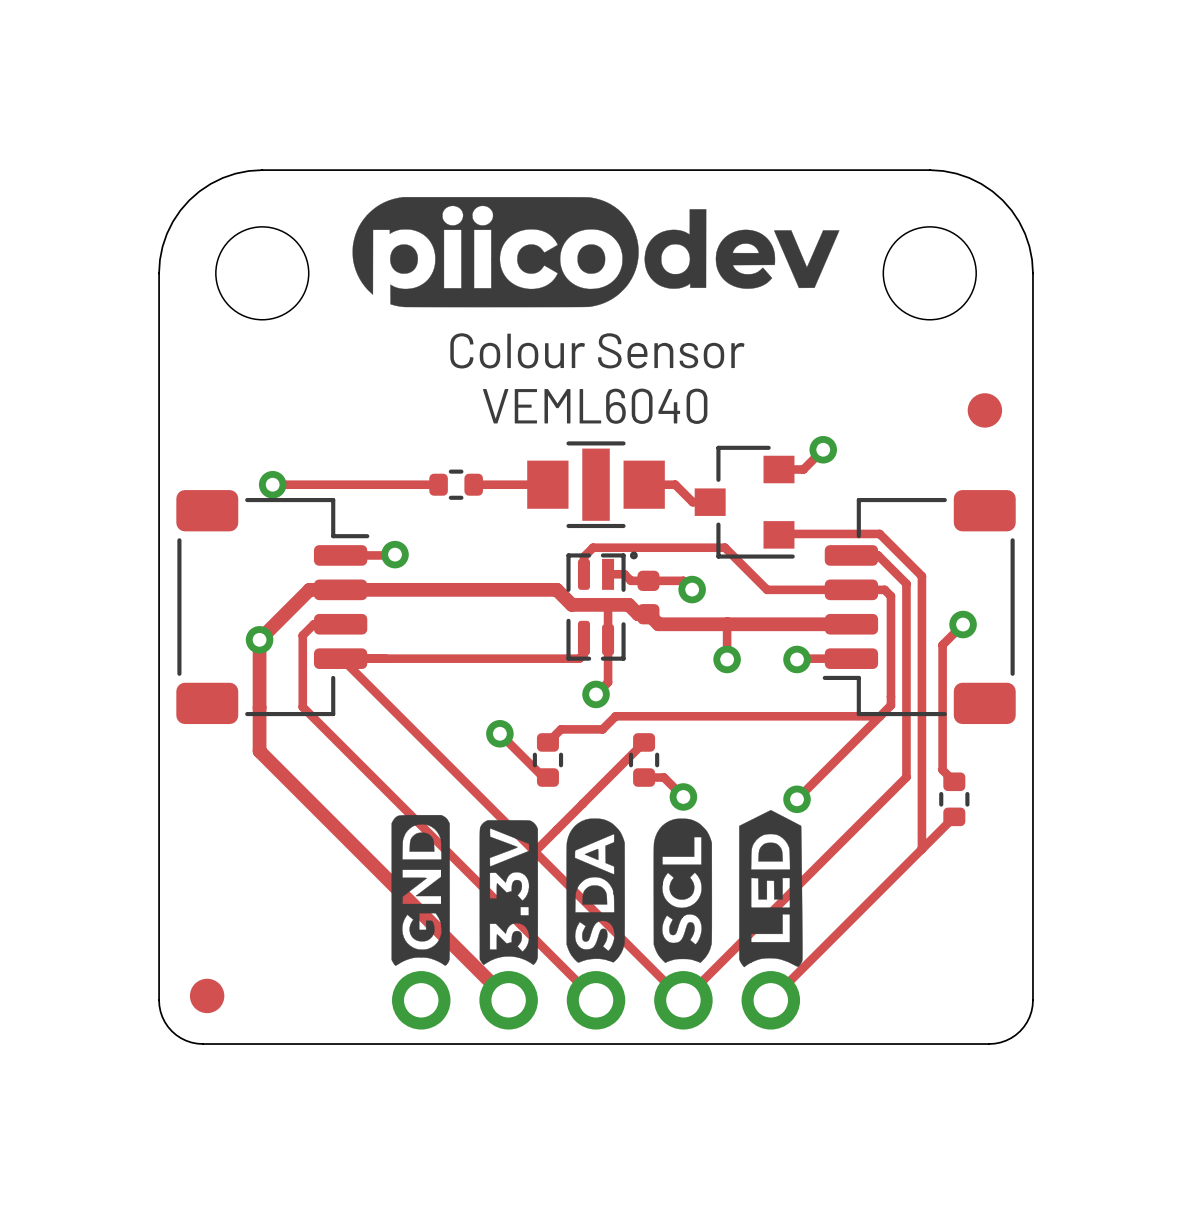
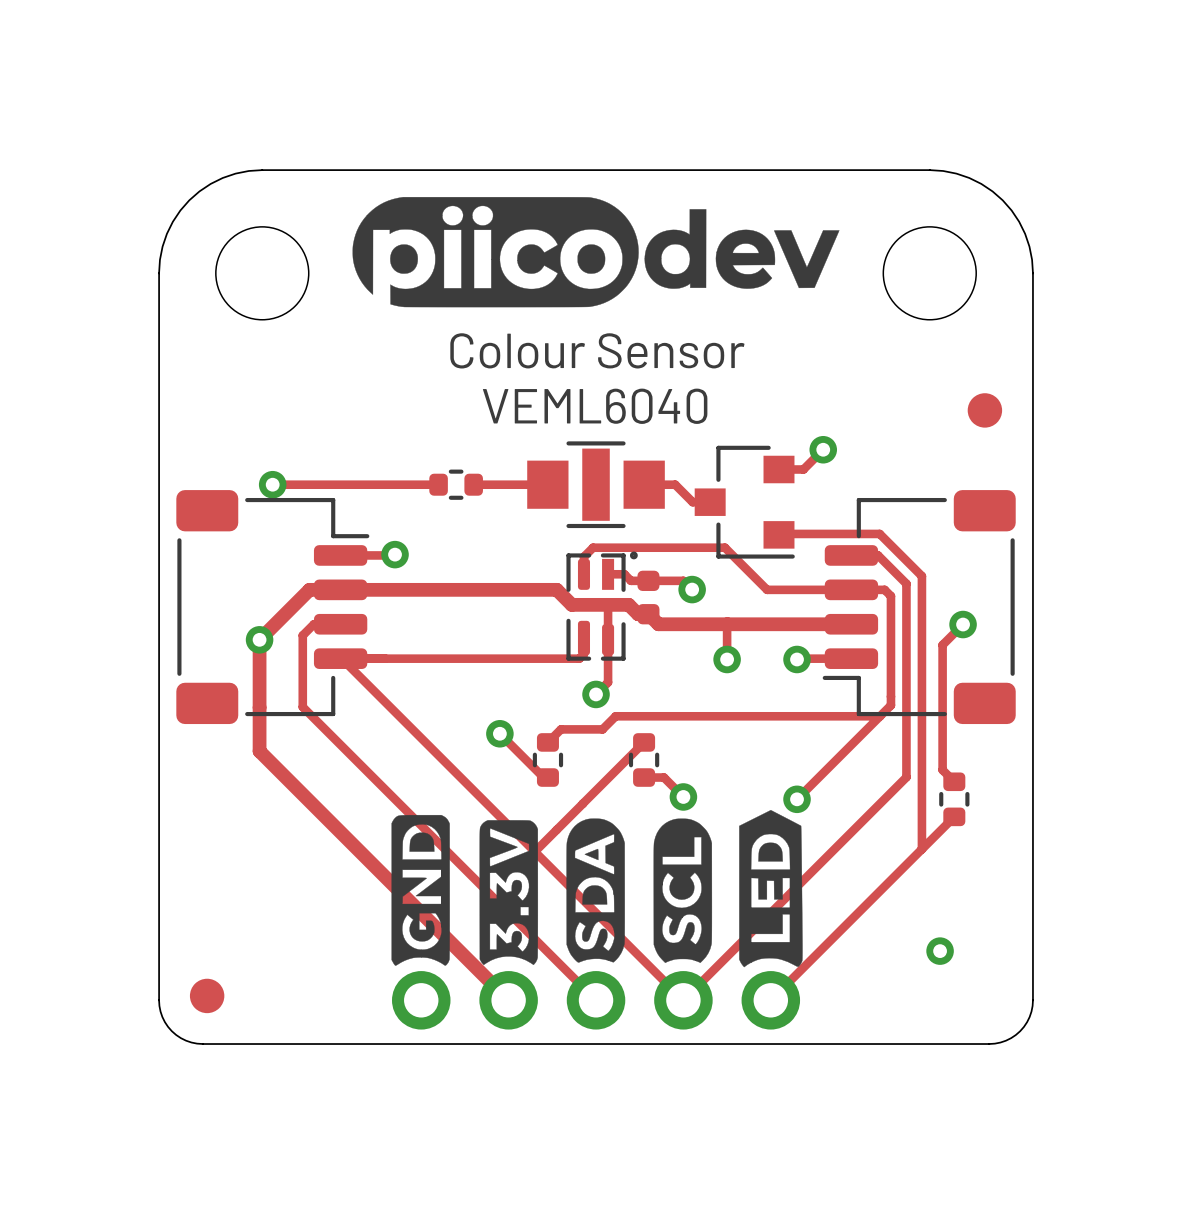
via: none -> (940, 951)

